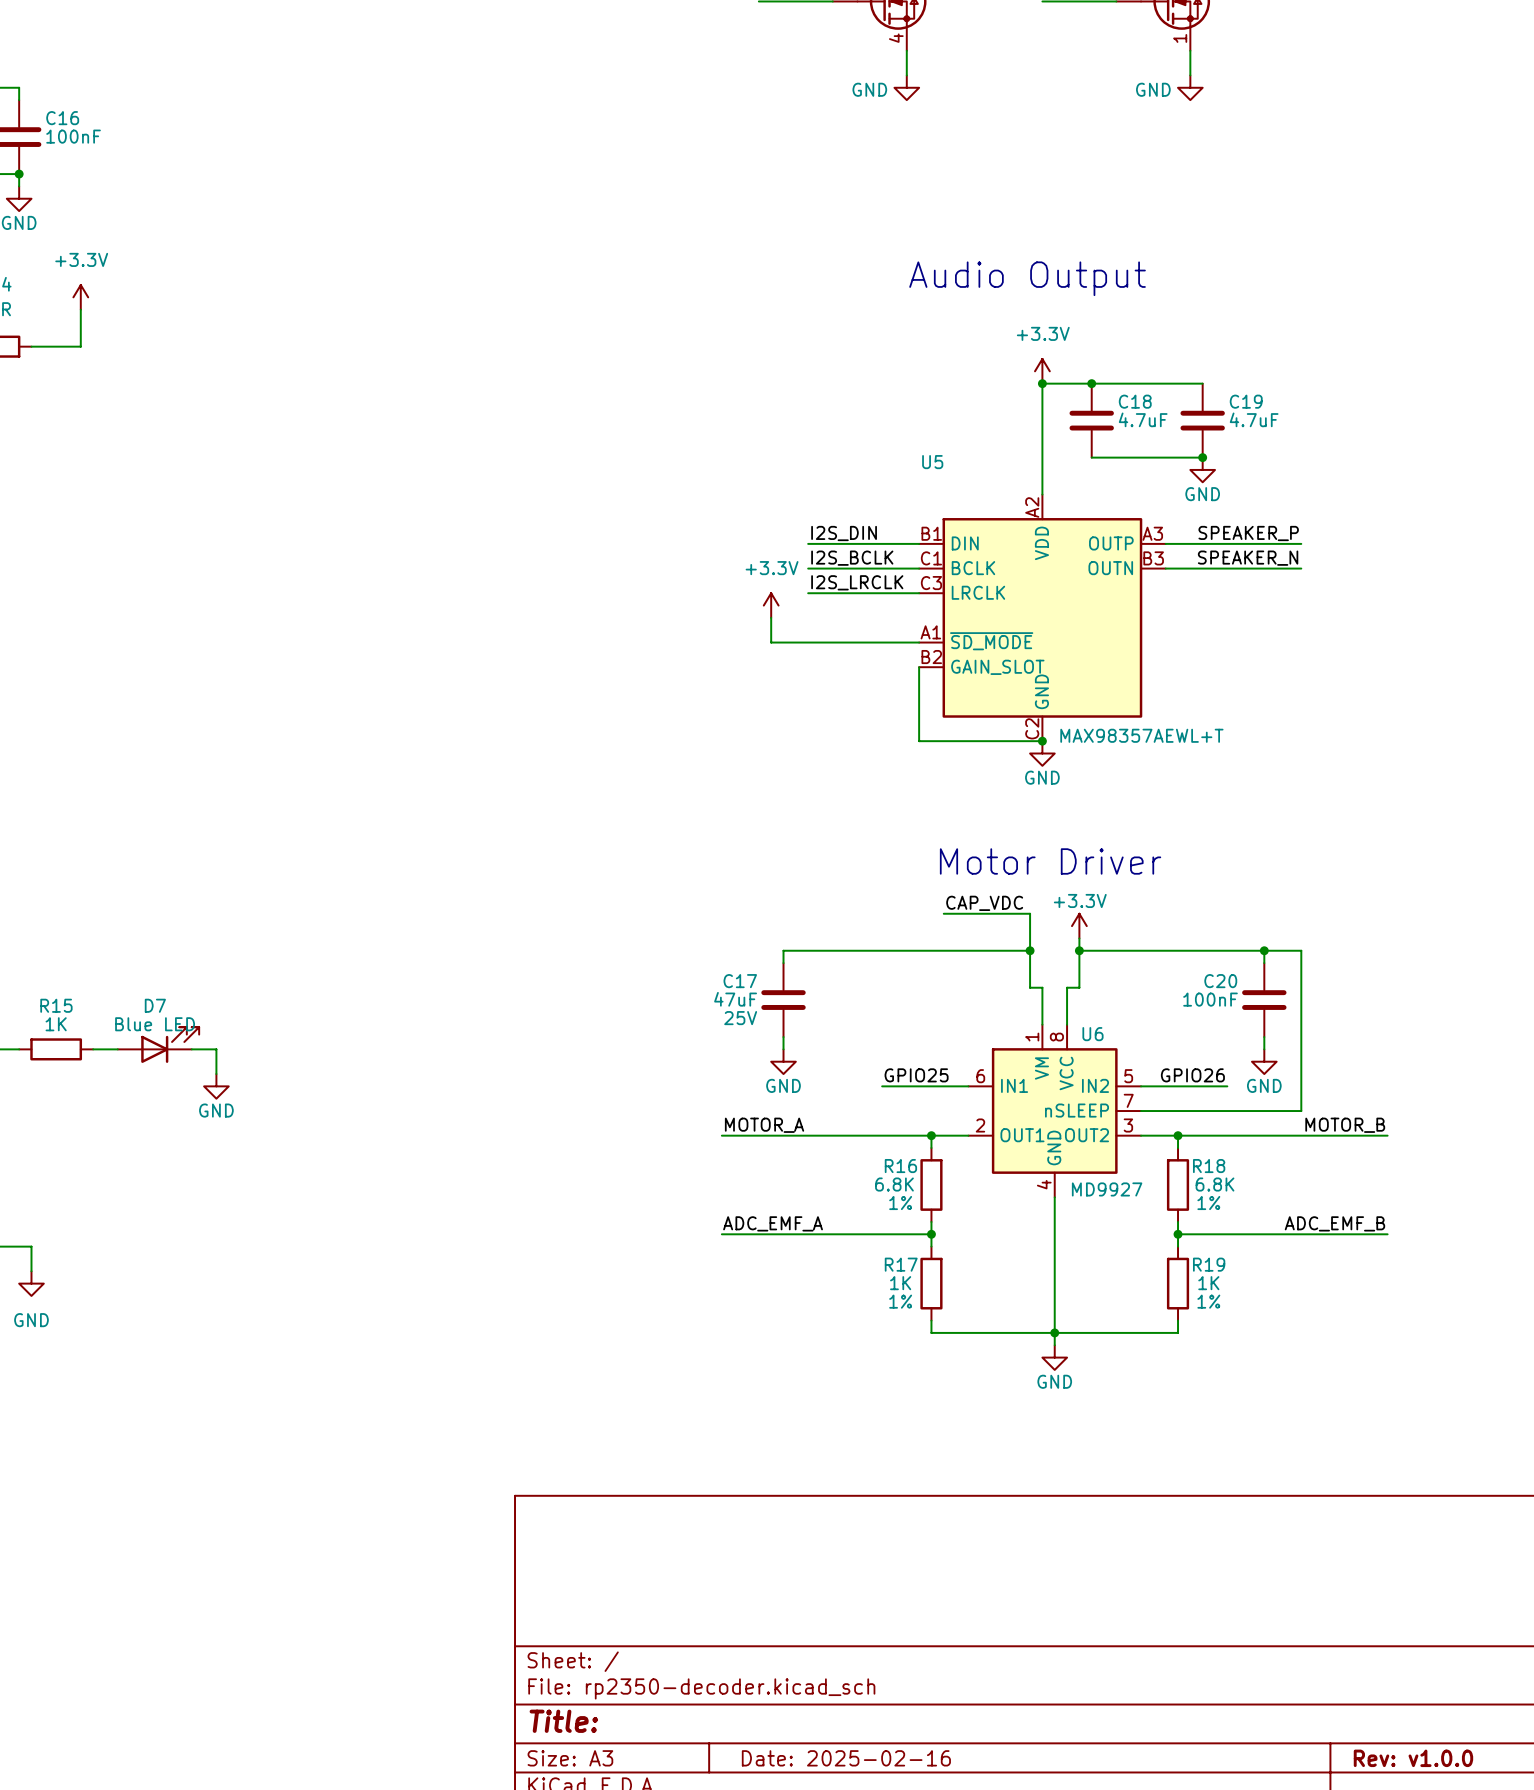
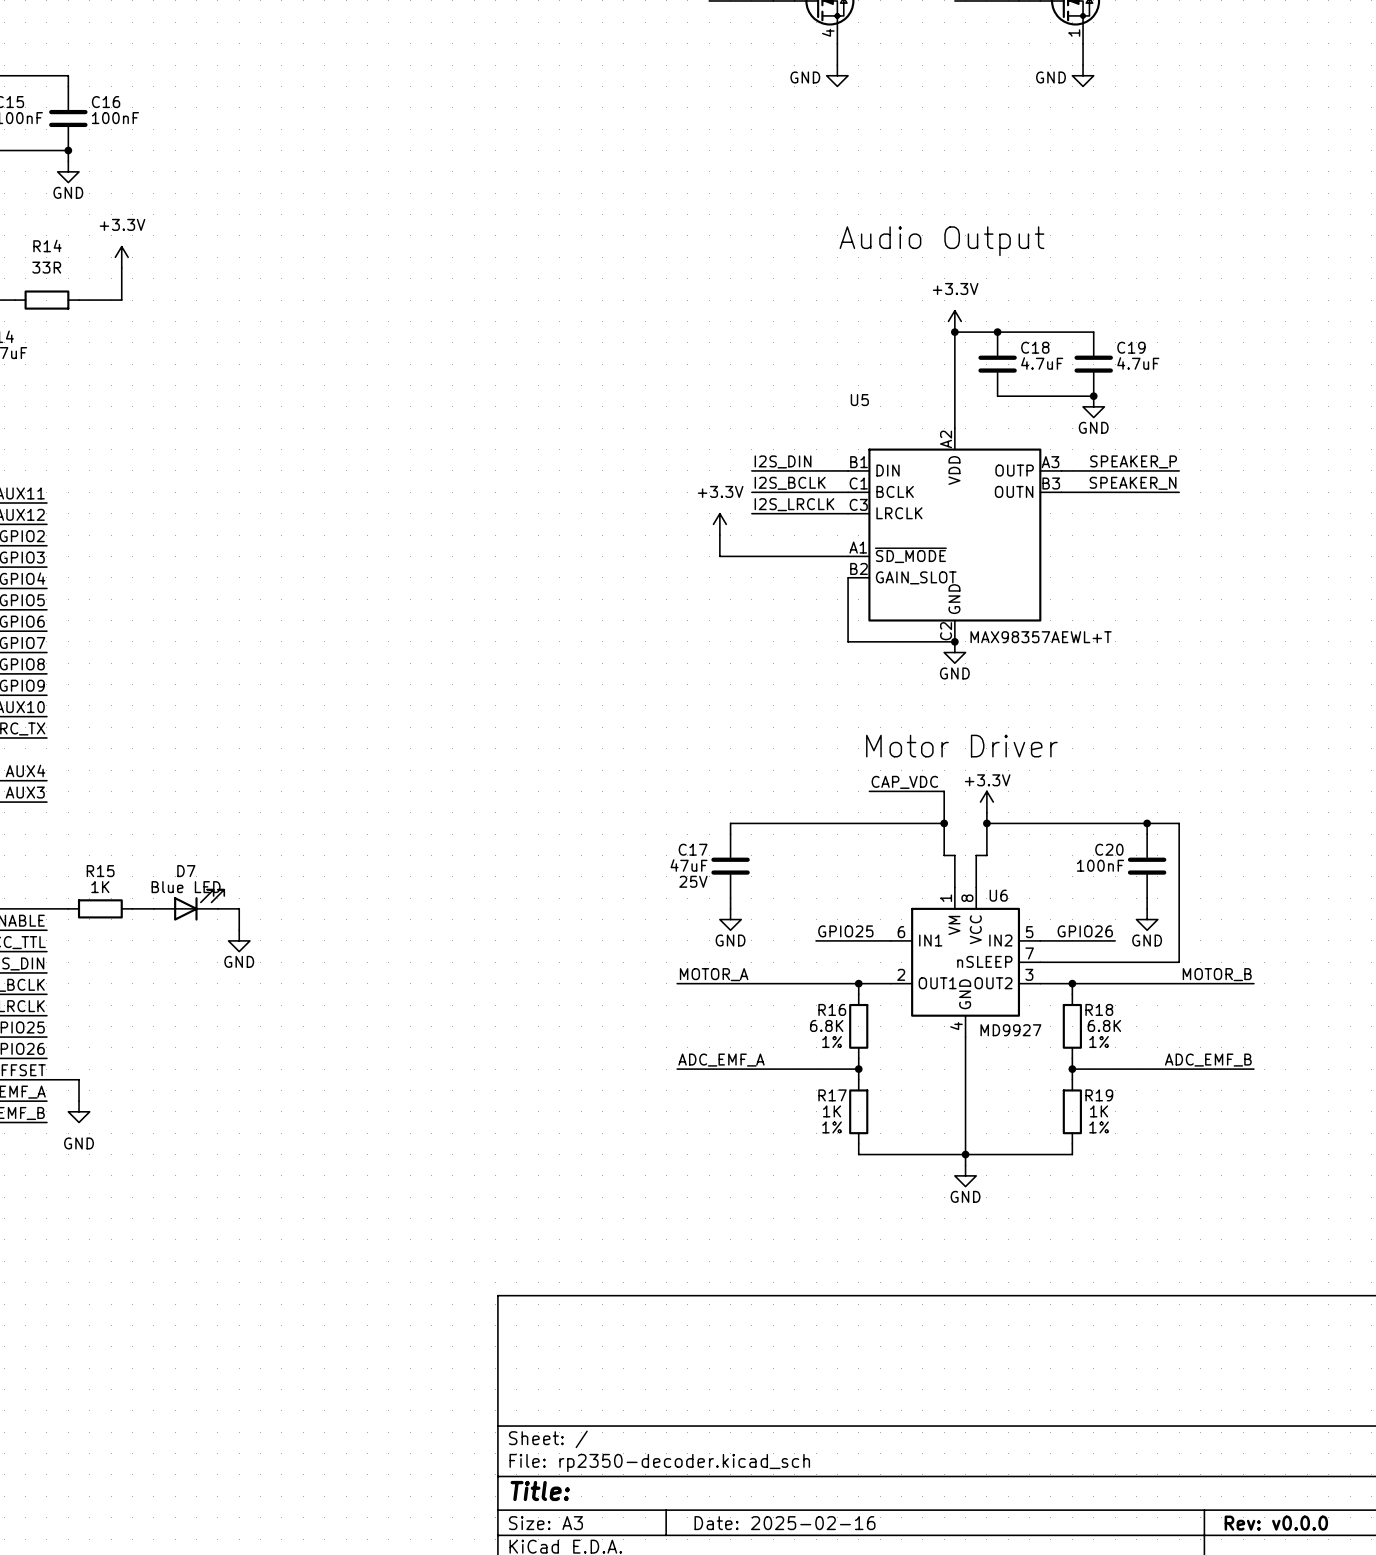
title block: Rev: v1.0.0 (1413, 1758) -> Rev: v0.0.0 (1276, 1523)

